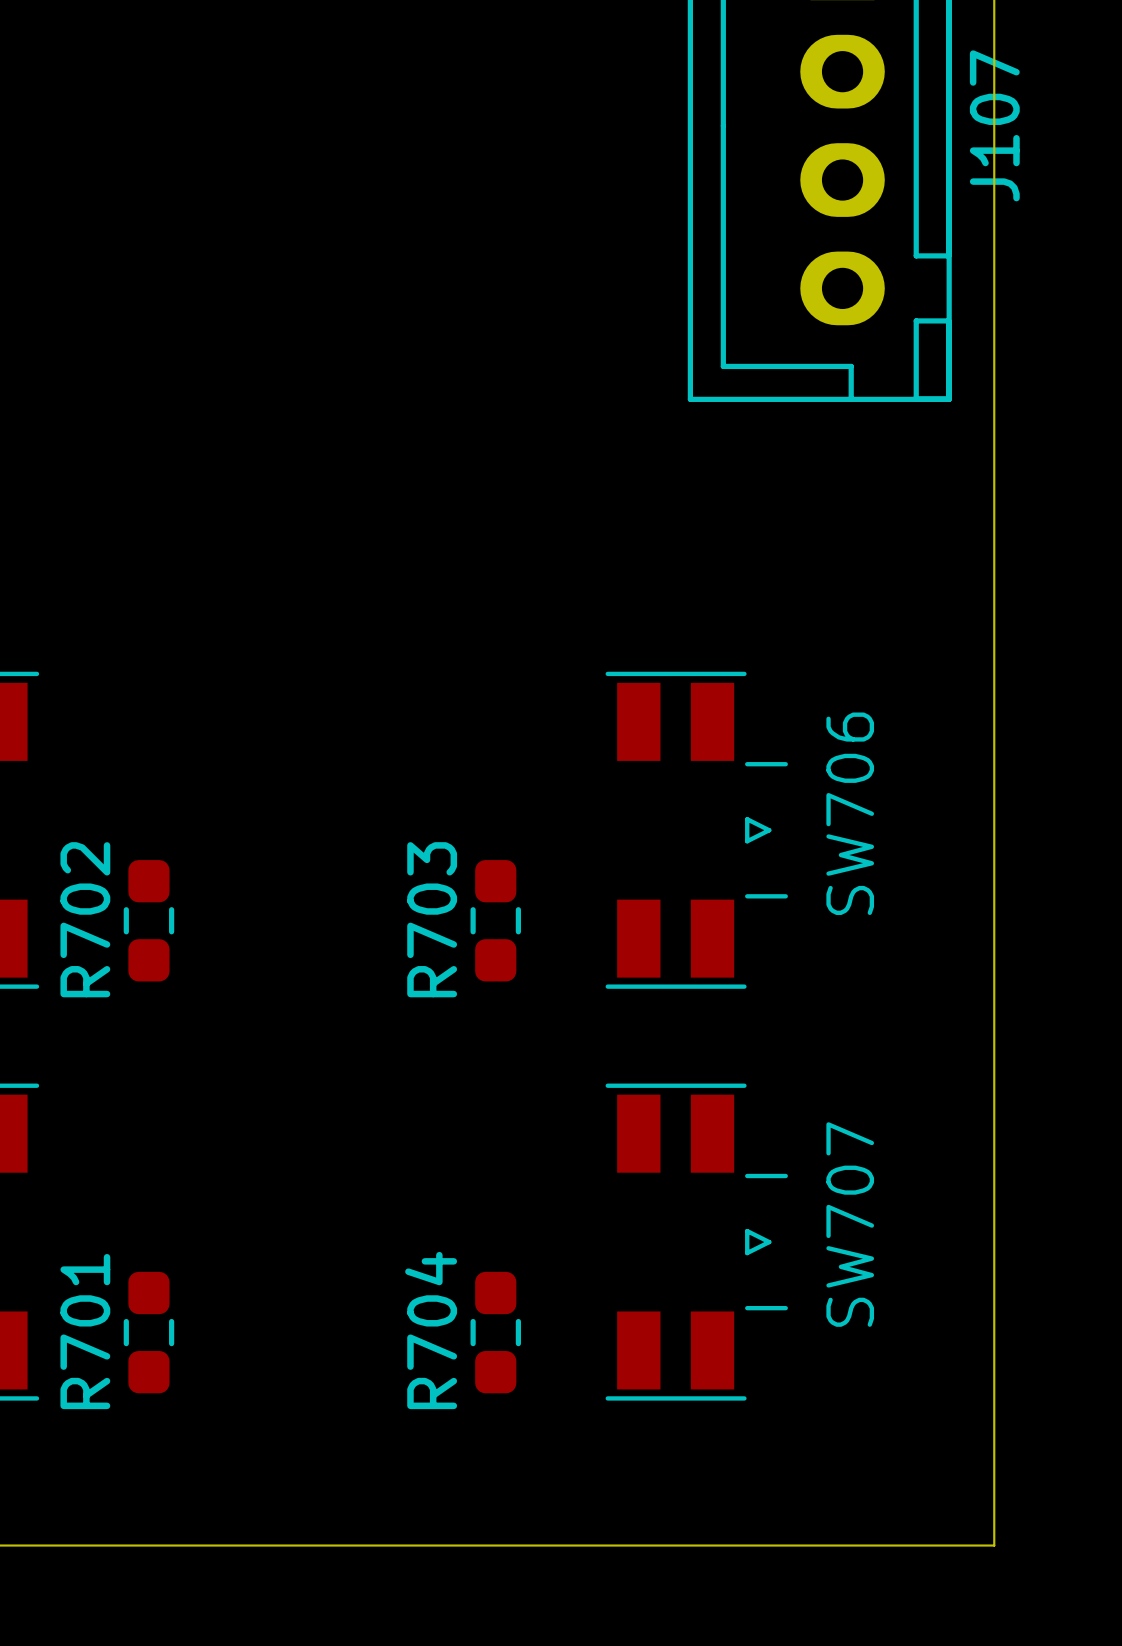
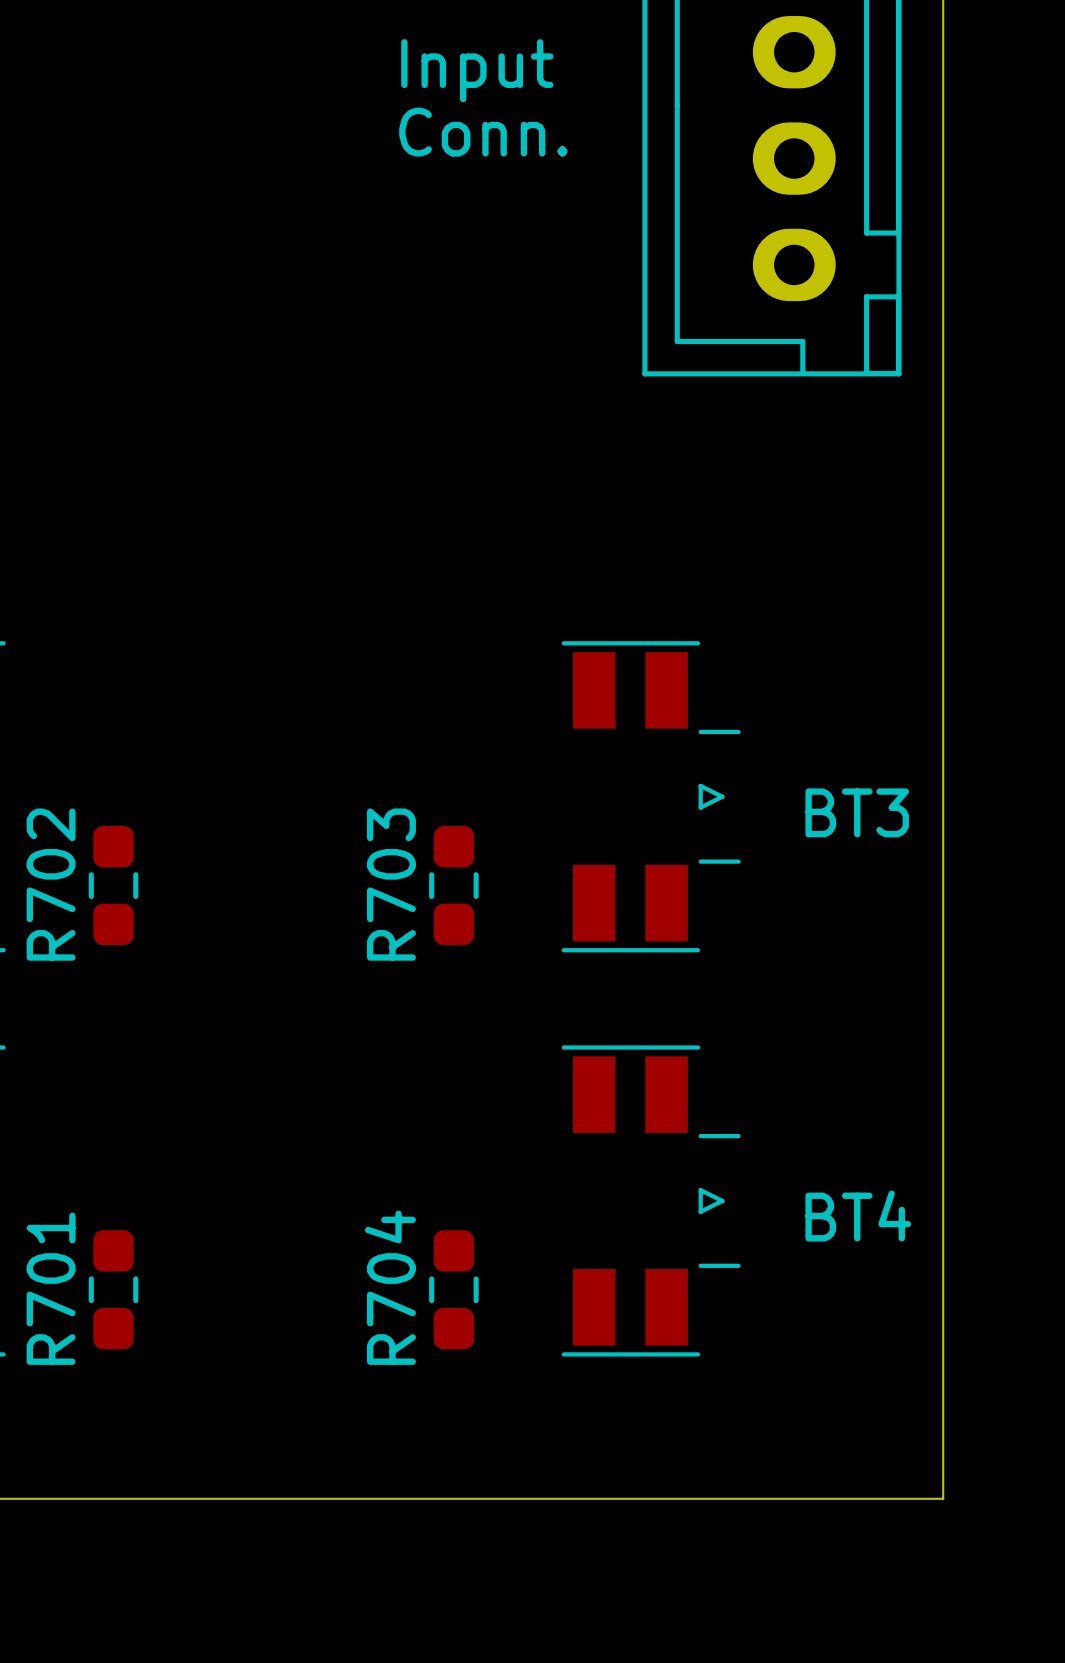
text: none -> Input (477, 70)
J107 name: J107 (994, 125) -> none
text: none -> Conn. (483, 132)
SW706 name: SW706 (850, 813) -> none
text: none -> BT3 (857, 812)
SW707 name: SW707 (850, 1224) -> none
text: none -> BT4 (858, 1216)

